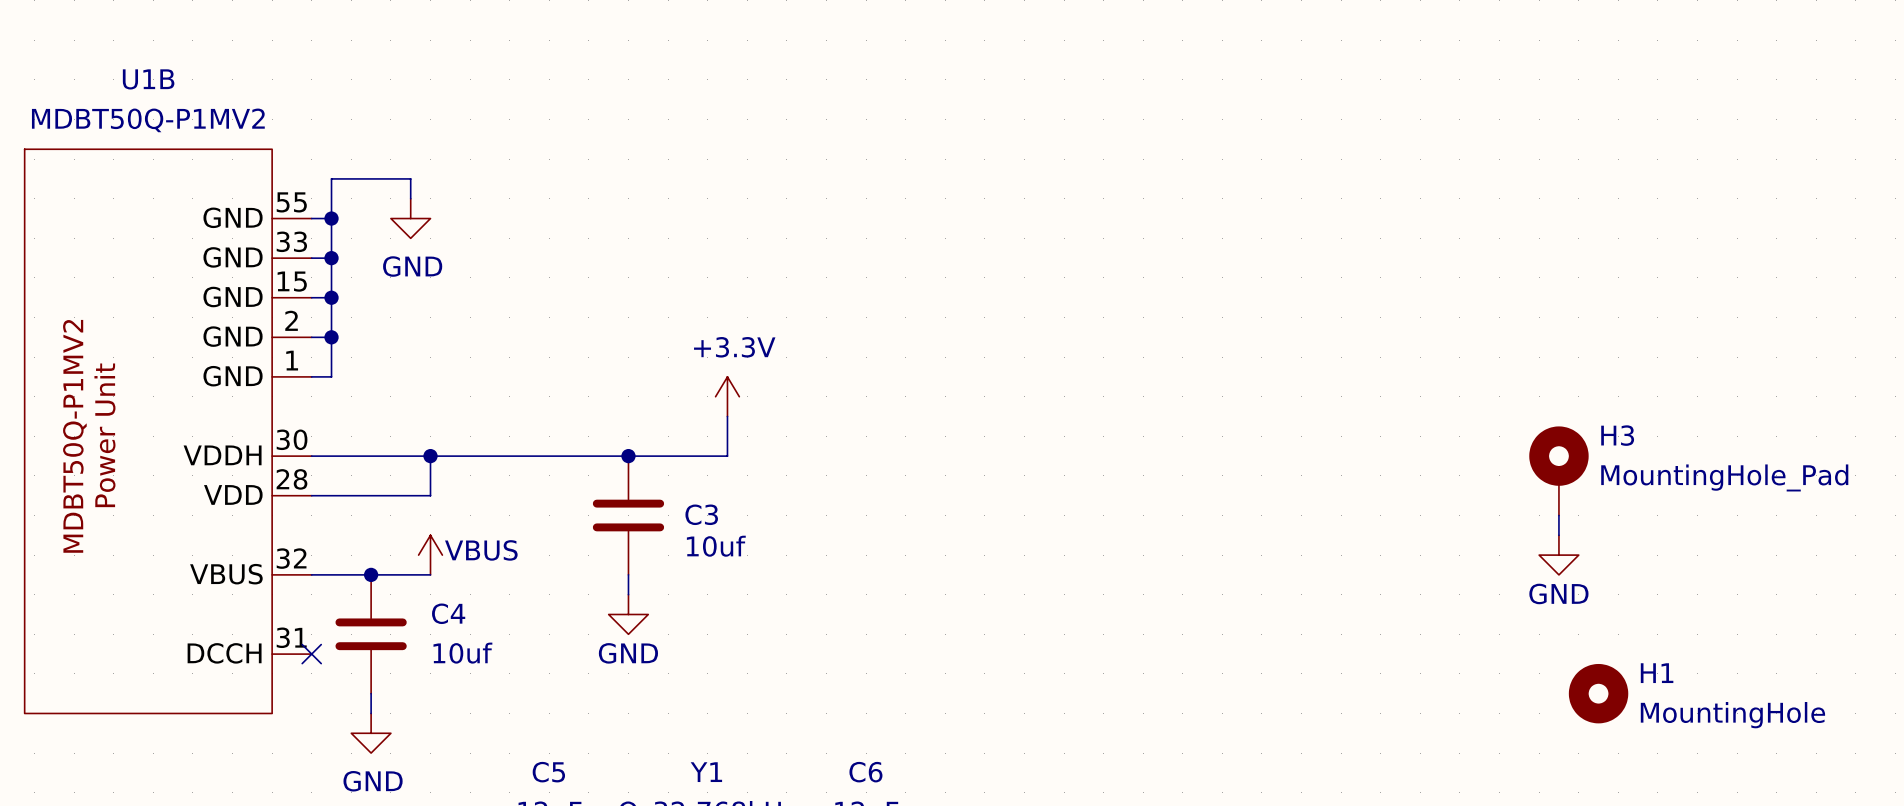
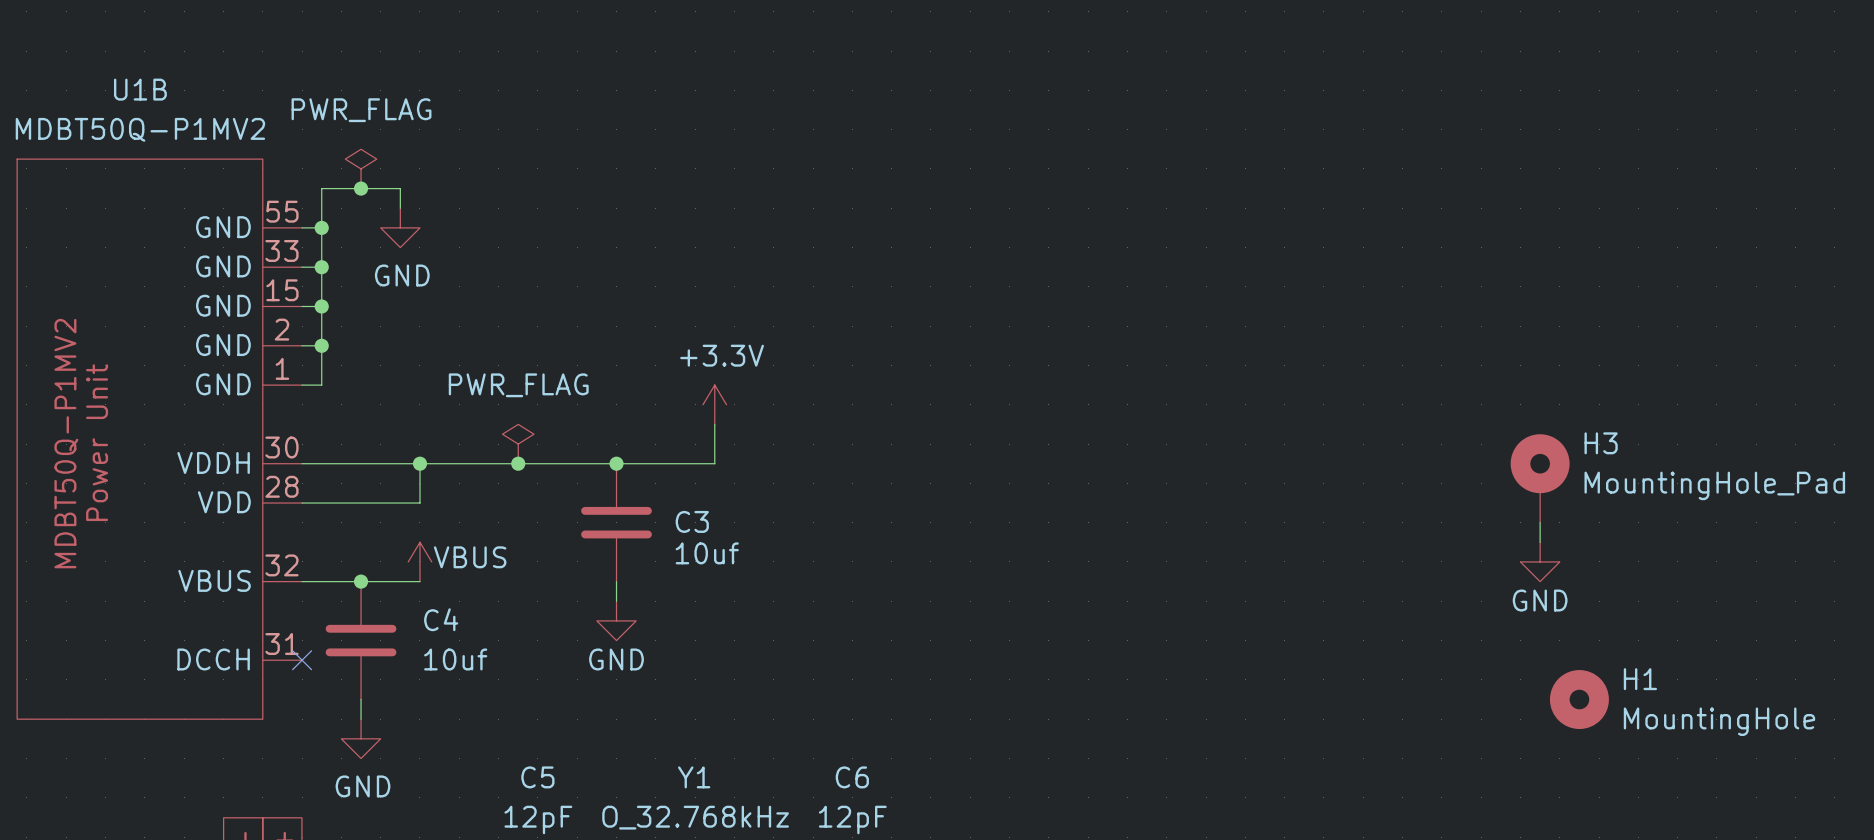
power symbol: none -> PWR_FLAG (361, 168)
junction: none -> (361, 188)
power symbol: none -> PWR_FLAG (518, 444)
junction: none -> (518, 463)

